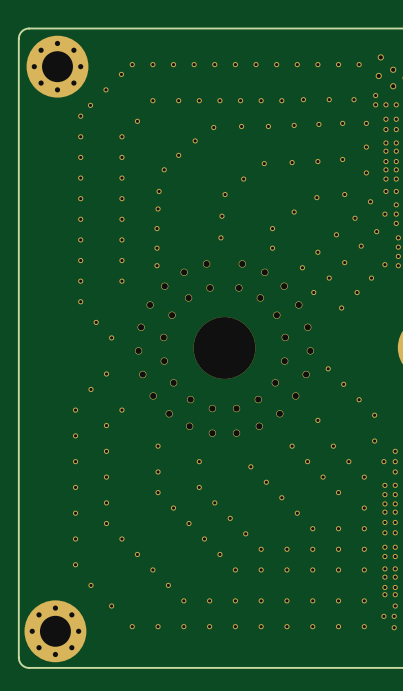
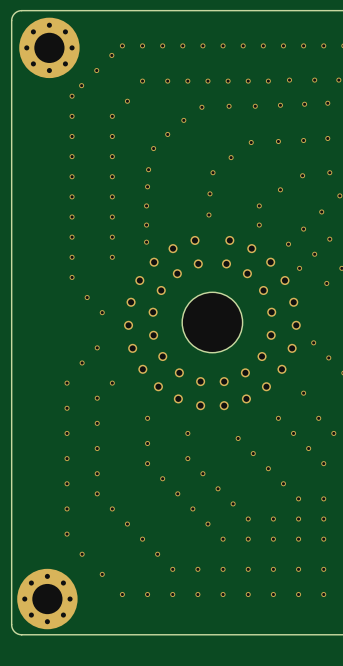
part footprint: [134, 260, 314, 437] -> [124, 235, 301, 411]

